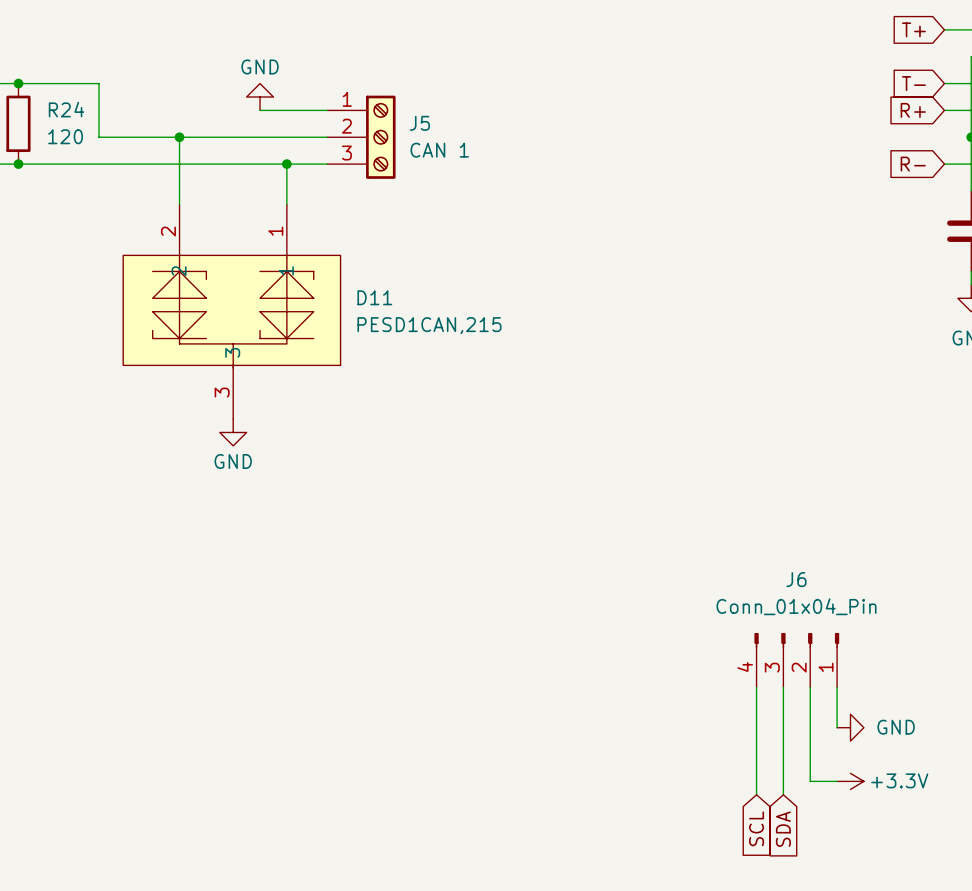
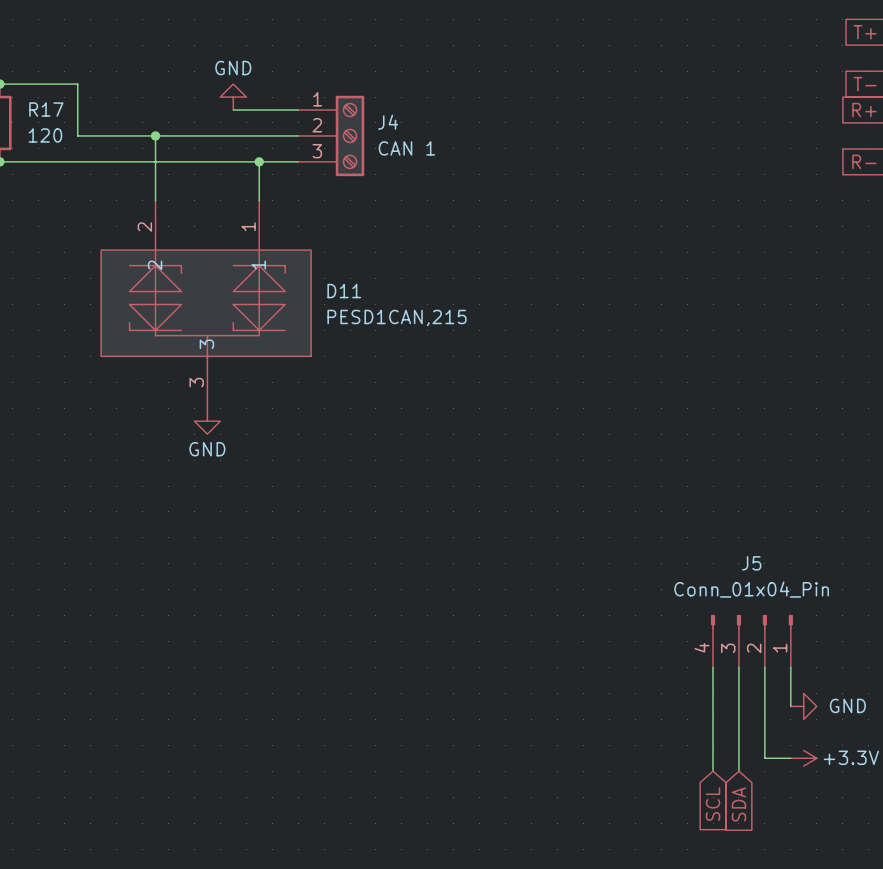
R24 name: R24 (66, 109) -> R17 (46, 109)
J5 name: J5 (419, 123) -> J4 (388, 122)
J6 name: J6 (796, 579) -> J5 (751, 563)

